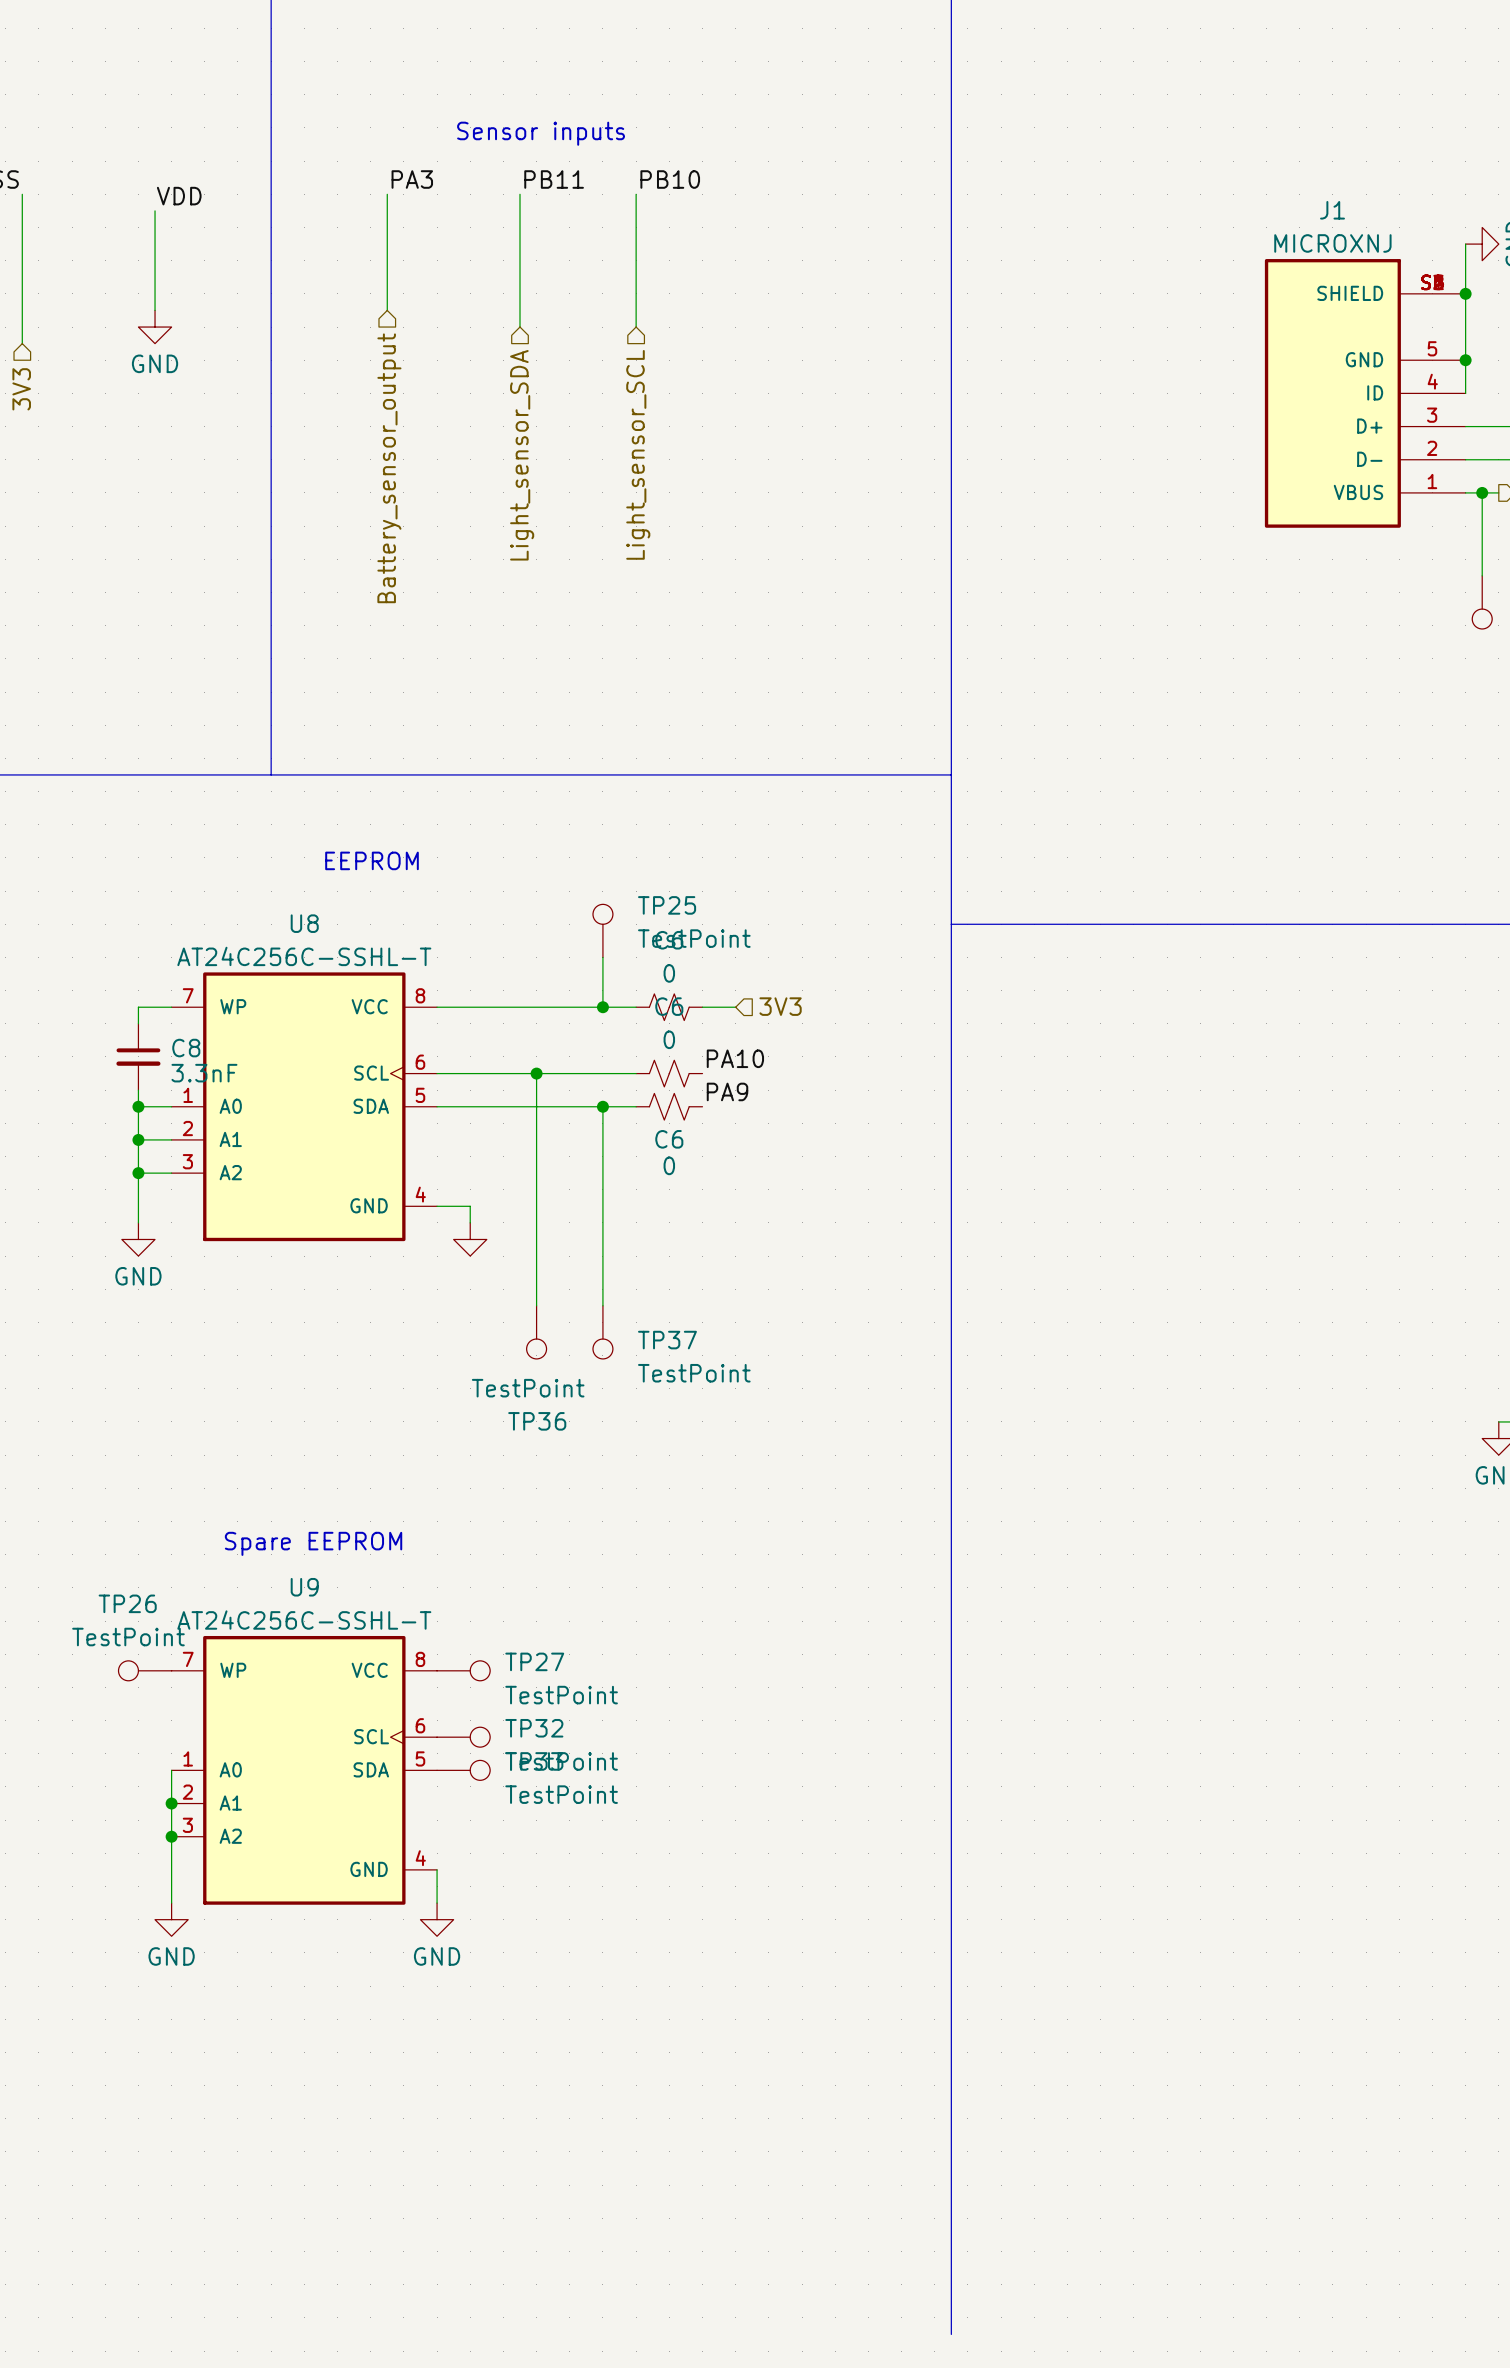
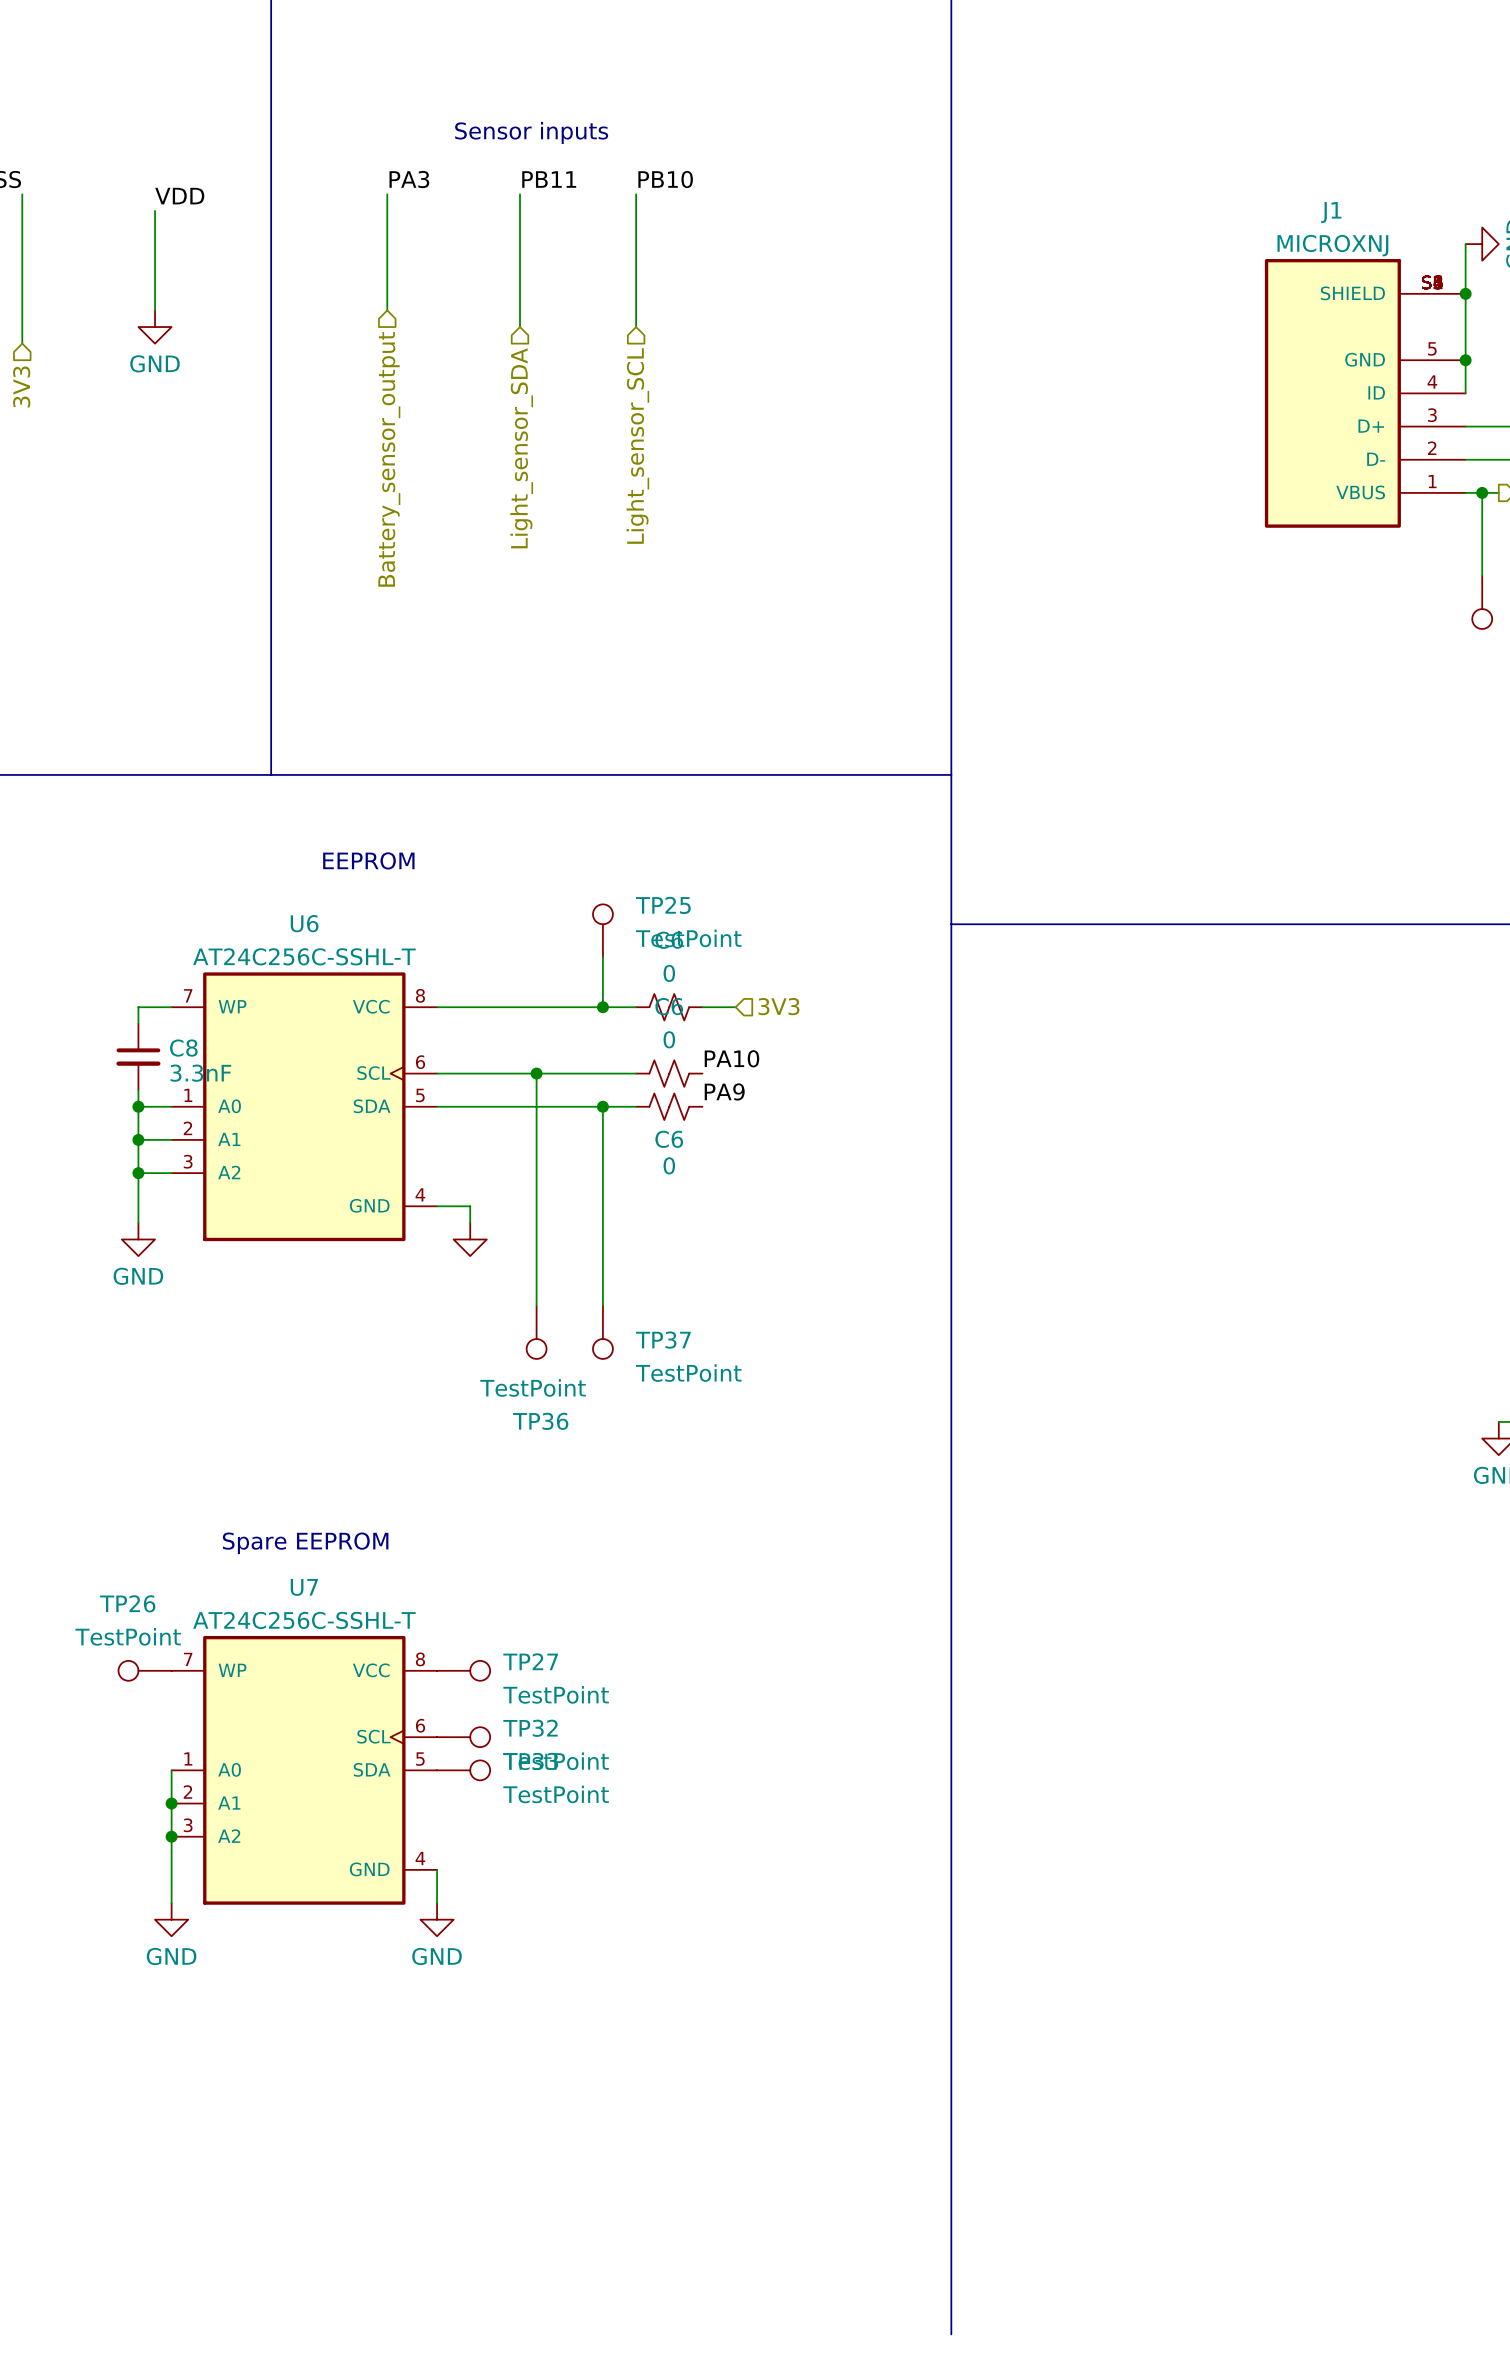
U8 name: U8 (304, 923) -> U6 (304, 923)
U9 name: U9 (304, 1587) -> U7 (304, 1587)

